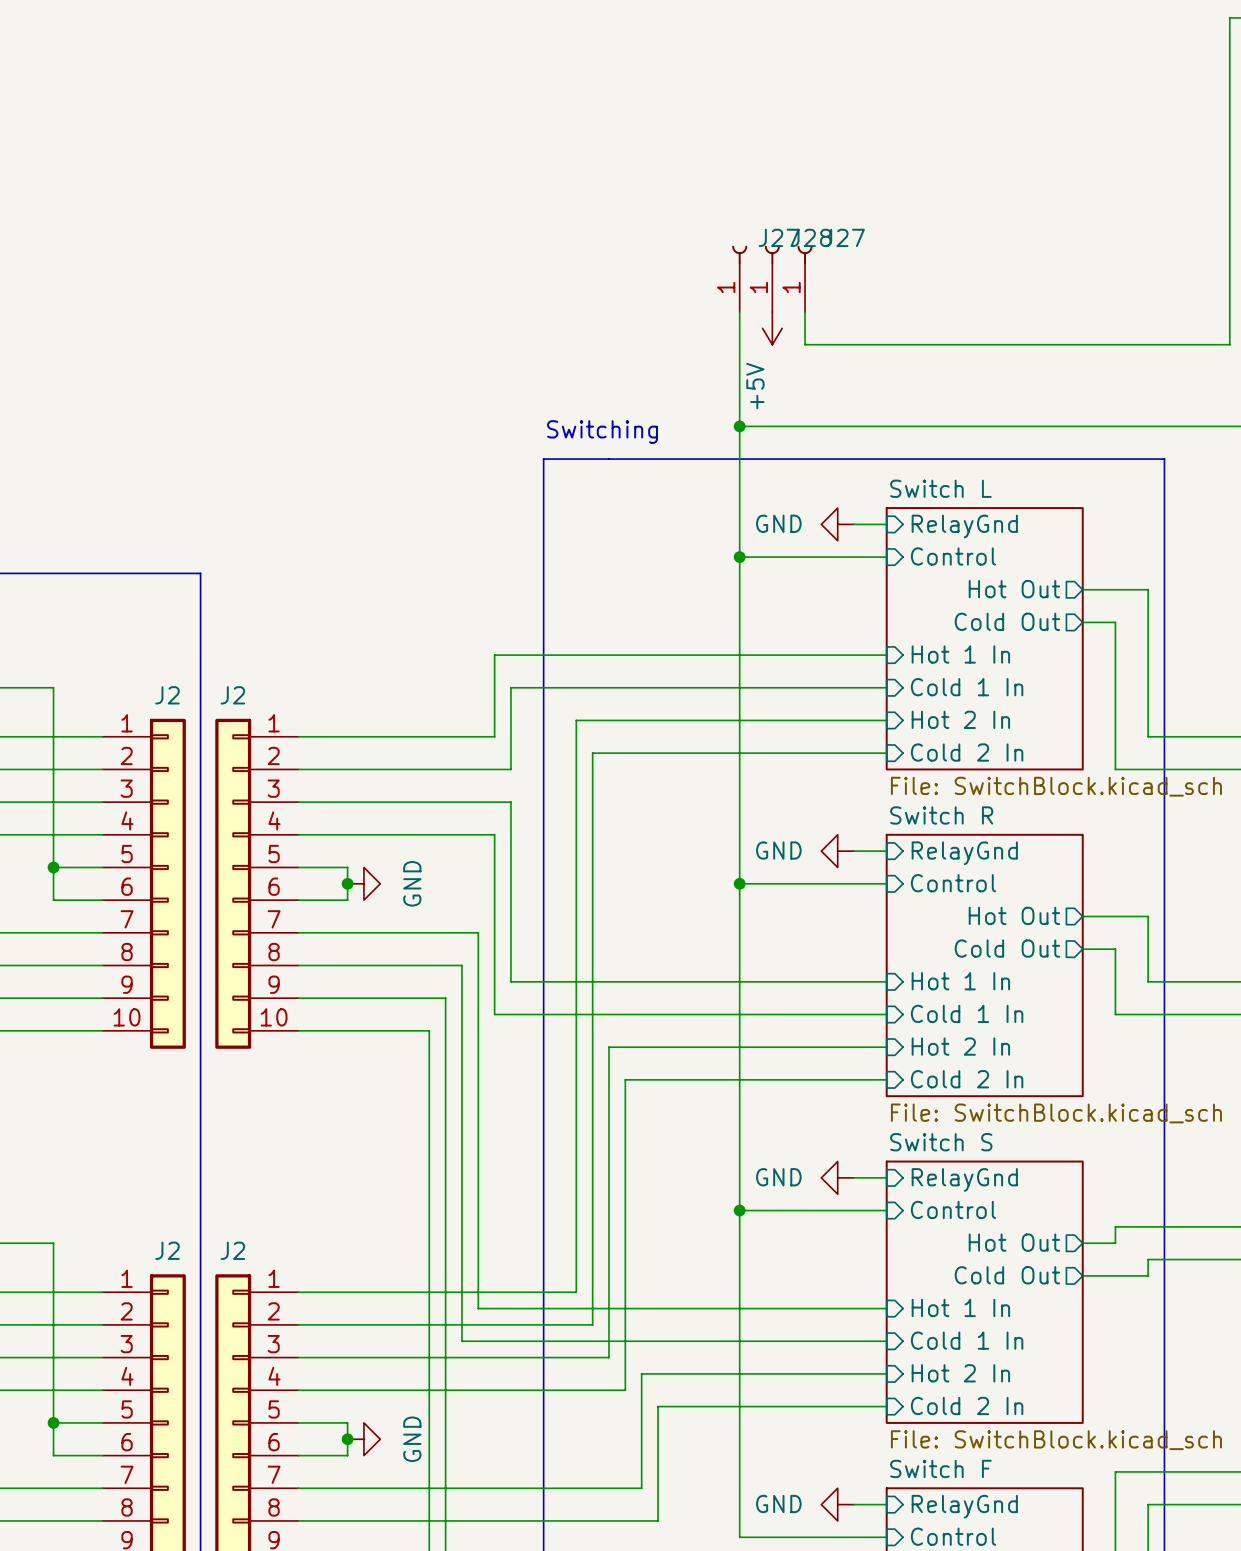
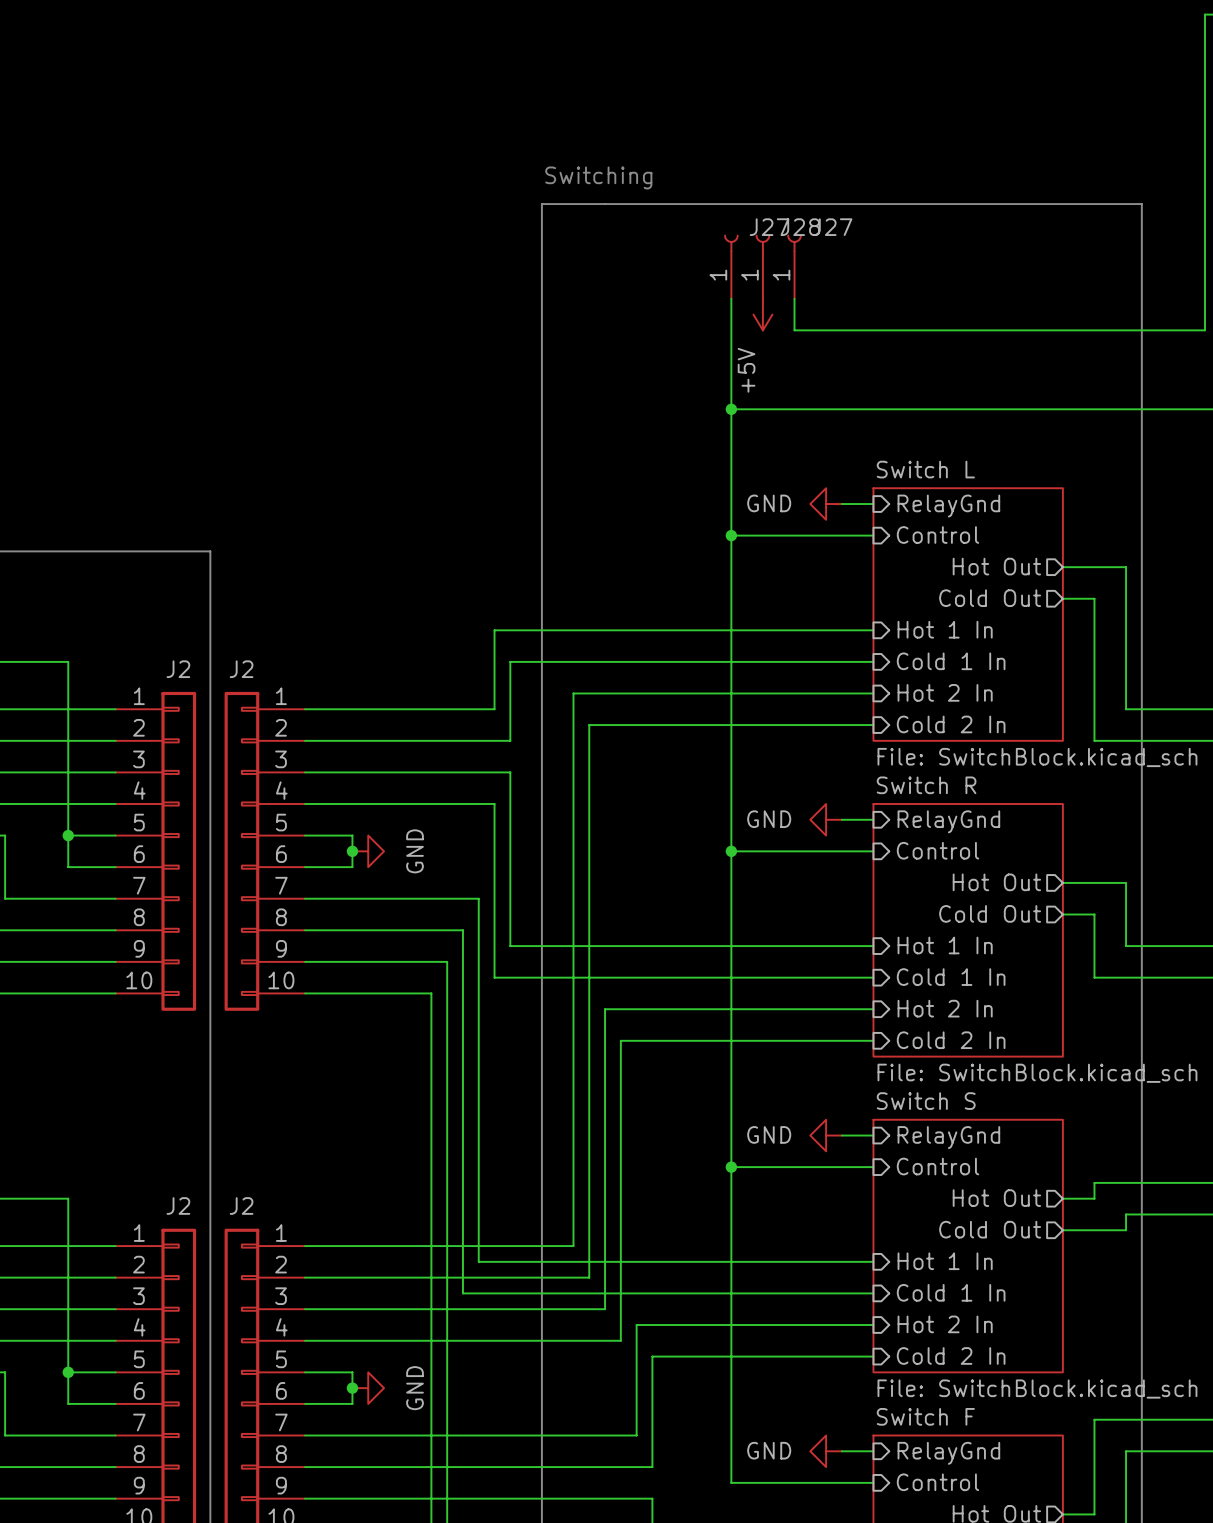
text position: Switching (602, 432) -> Switching (598, 177)
line: (543, 459) (1164, 459) -> (541, 440) (541, 204) (1141, 204) (1141, 440)

